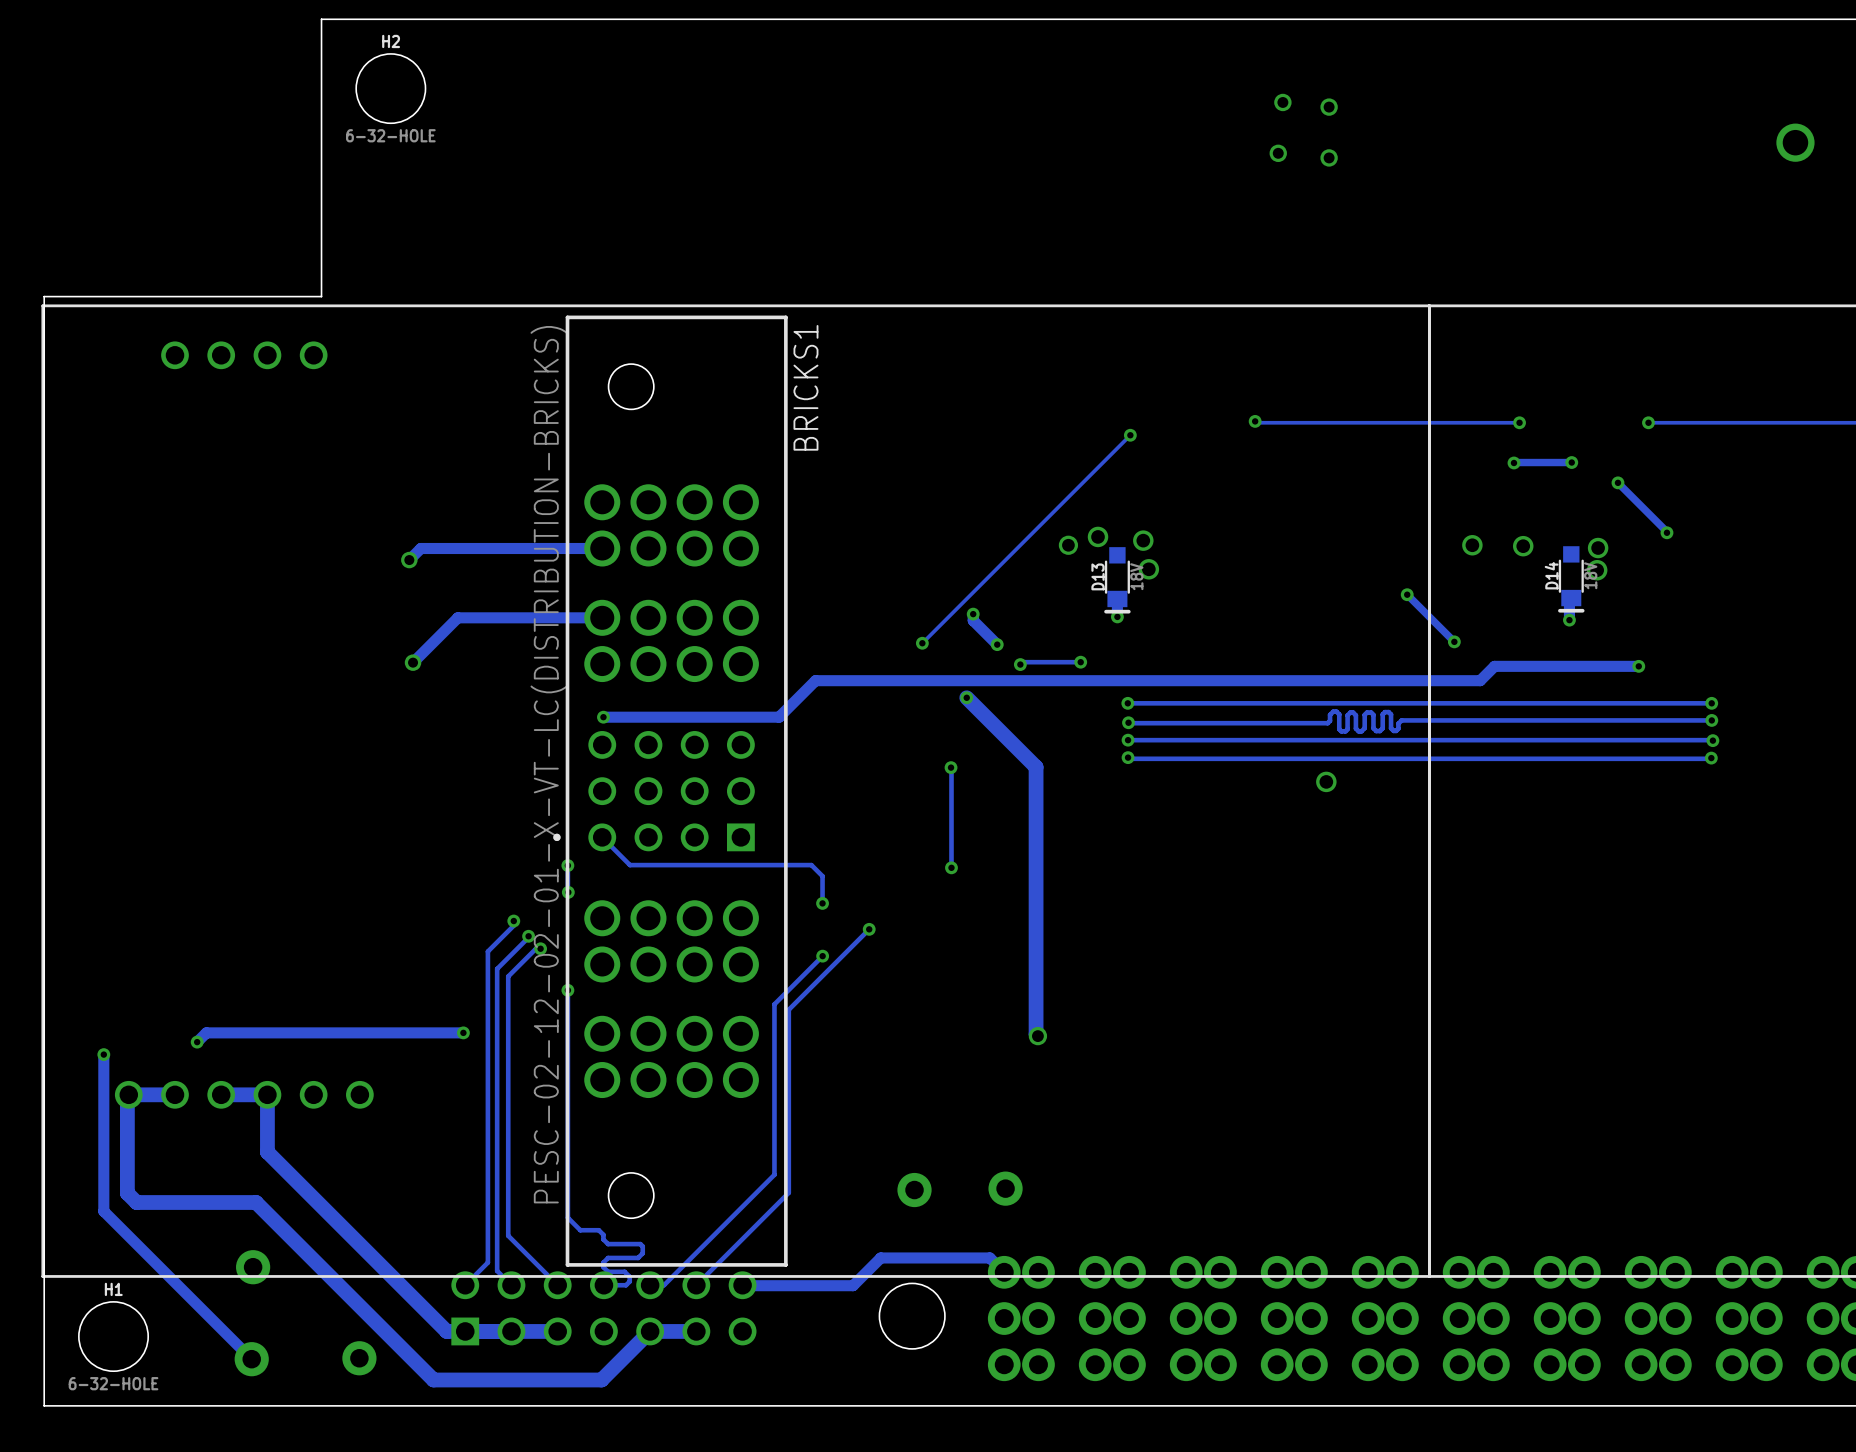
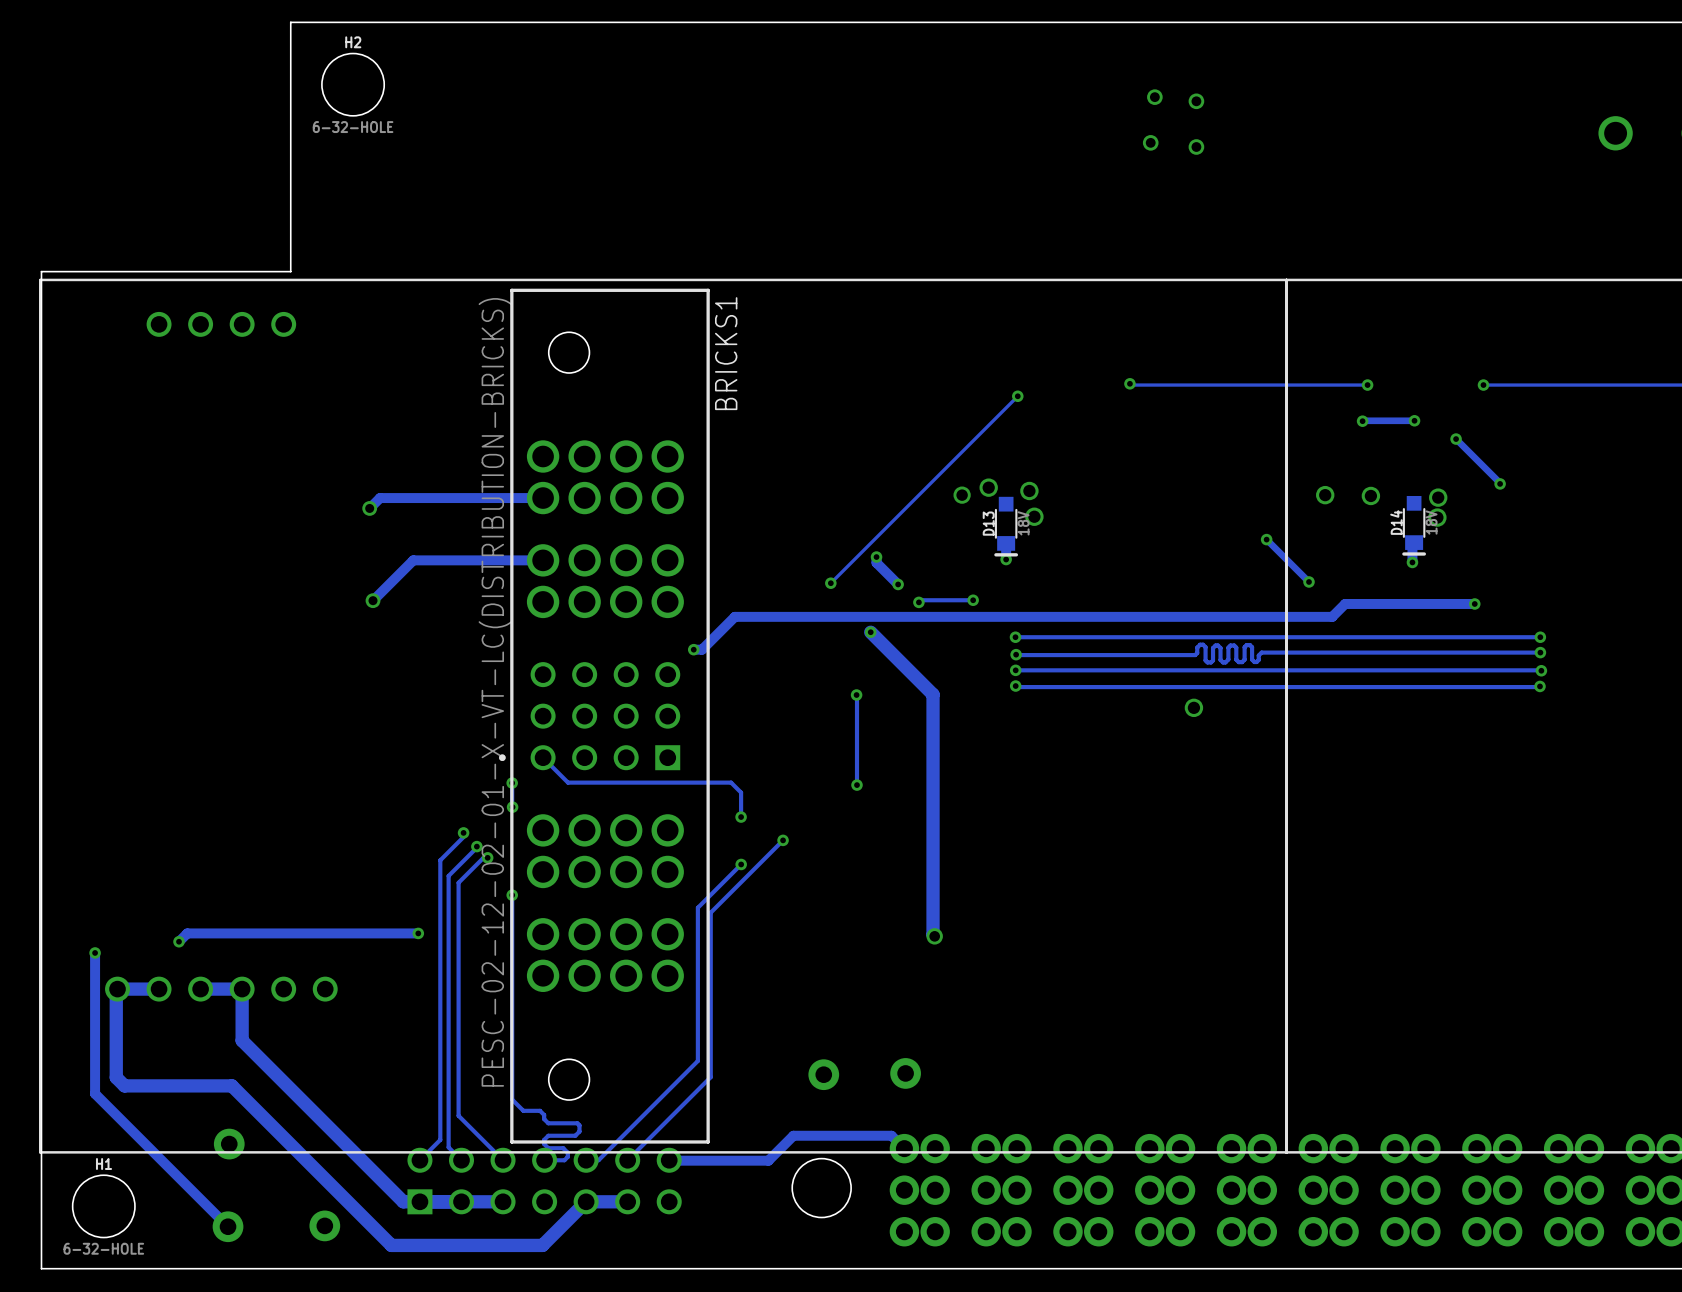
via: (603, 717) -> none
track: (769, 717) (603, 717) -> none
via: none -> (693, 649)

